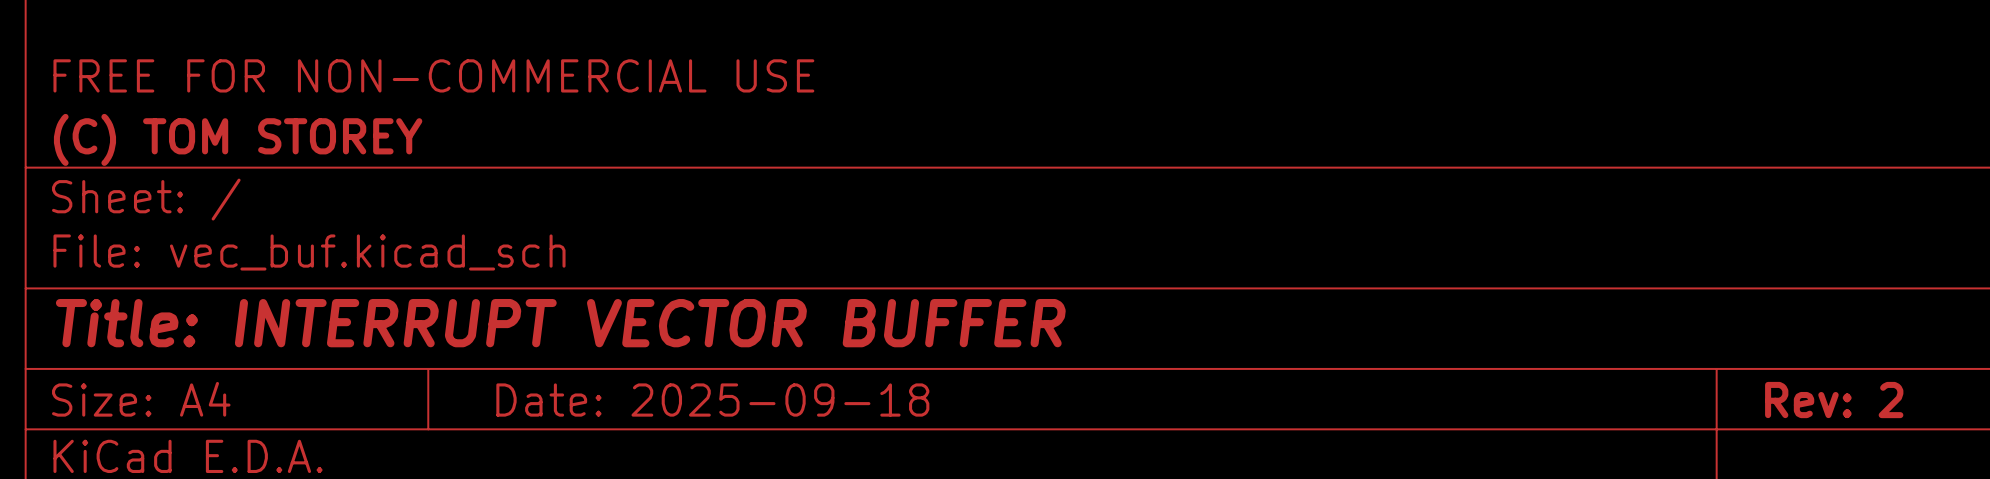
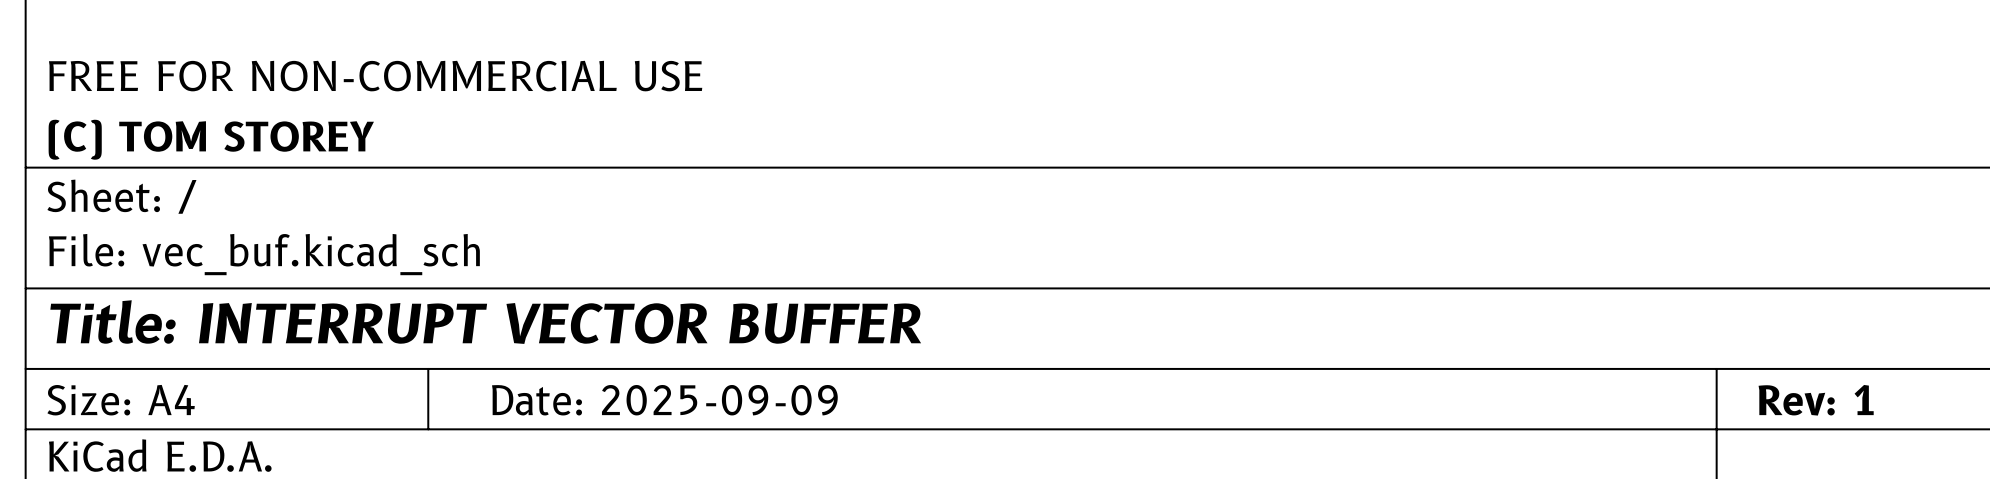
title block: Date: 2025-09-18 (712, 400) -> Date: 2025-09-09 (664, 400)
title block: Rev: 2 (1834, 400) -> Rev: 1 (1816, 400)

